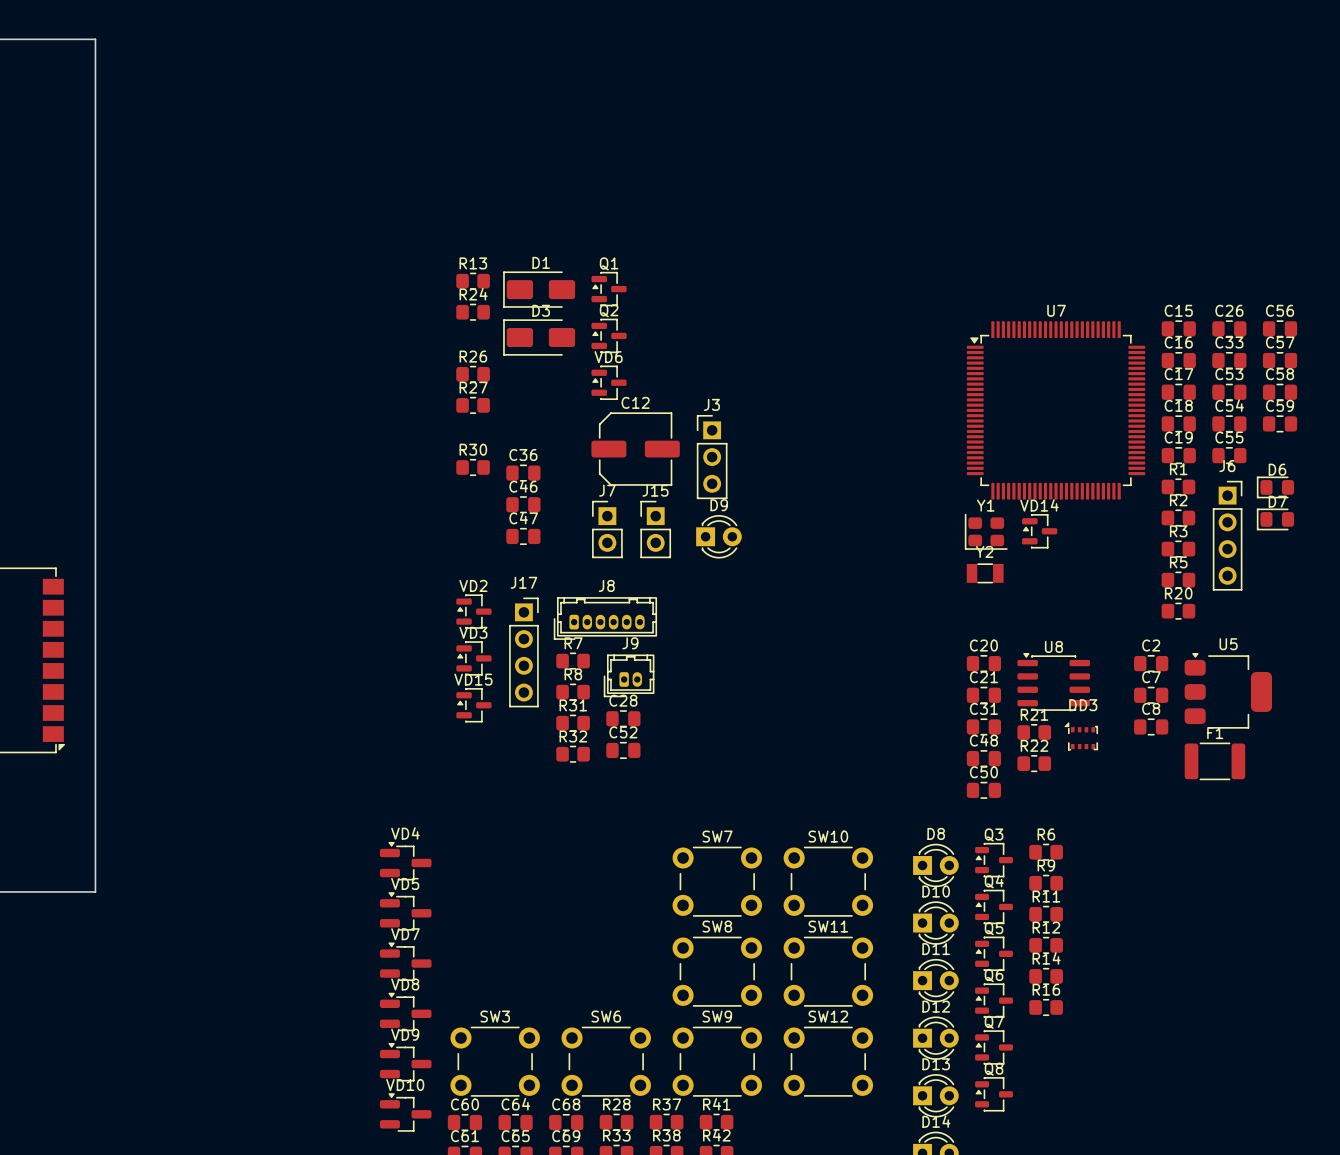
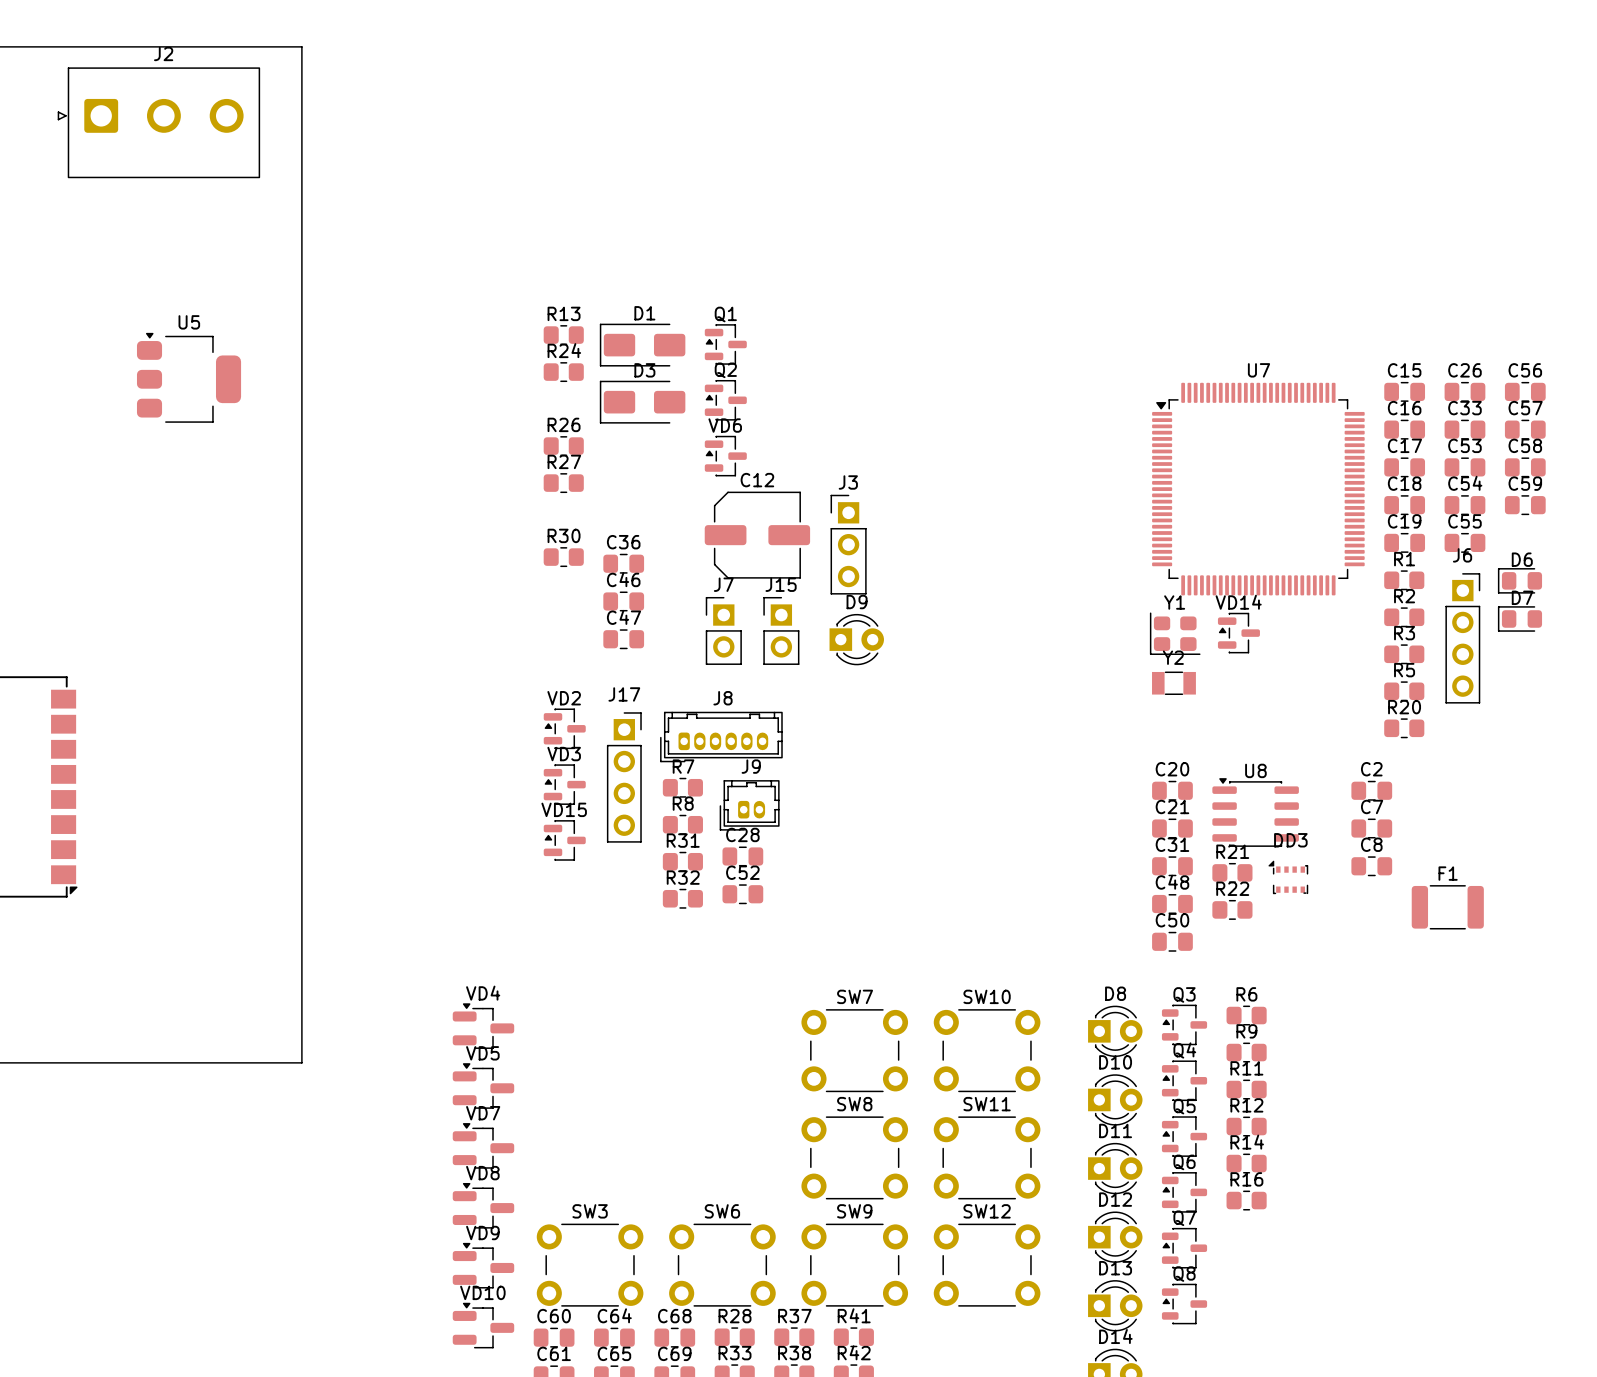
board edge: (95, 39) (95, 891) -> (113, 46) (301, 46) (301, 1062) (113, 1062)
J2: none -> (158, 122)
U5 position: (1228, 690) -> (189, 377)

